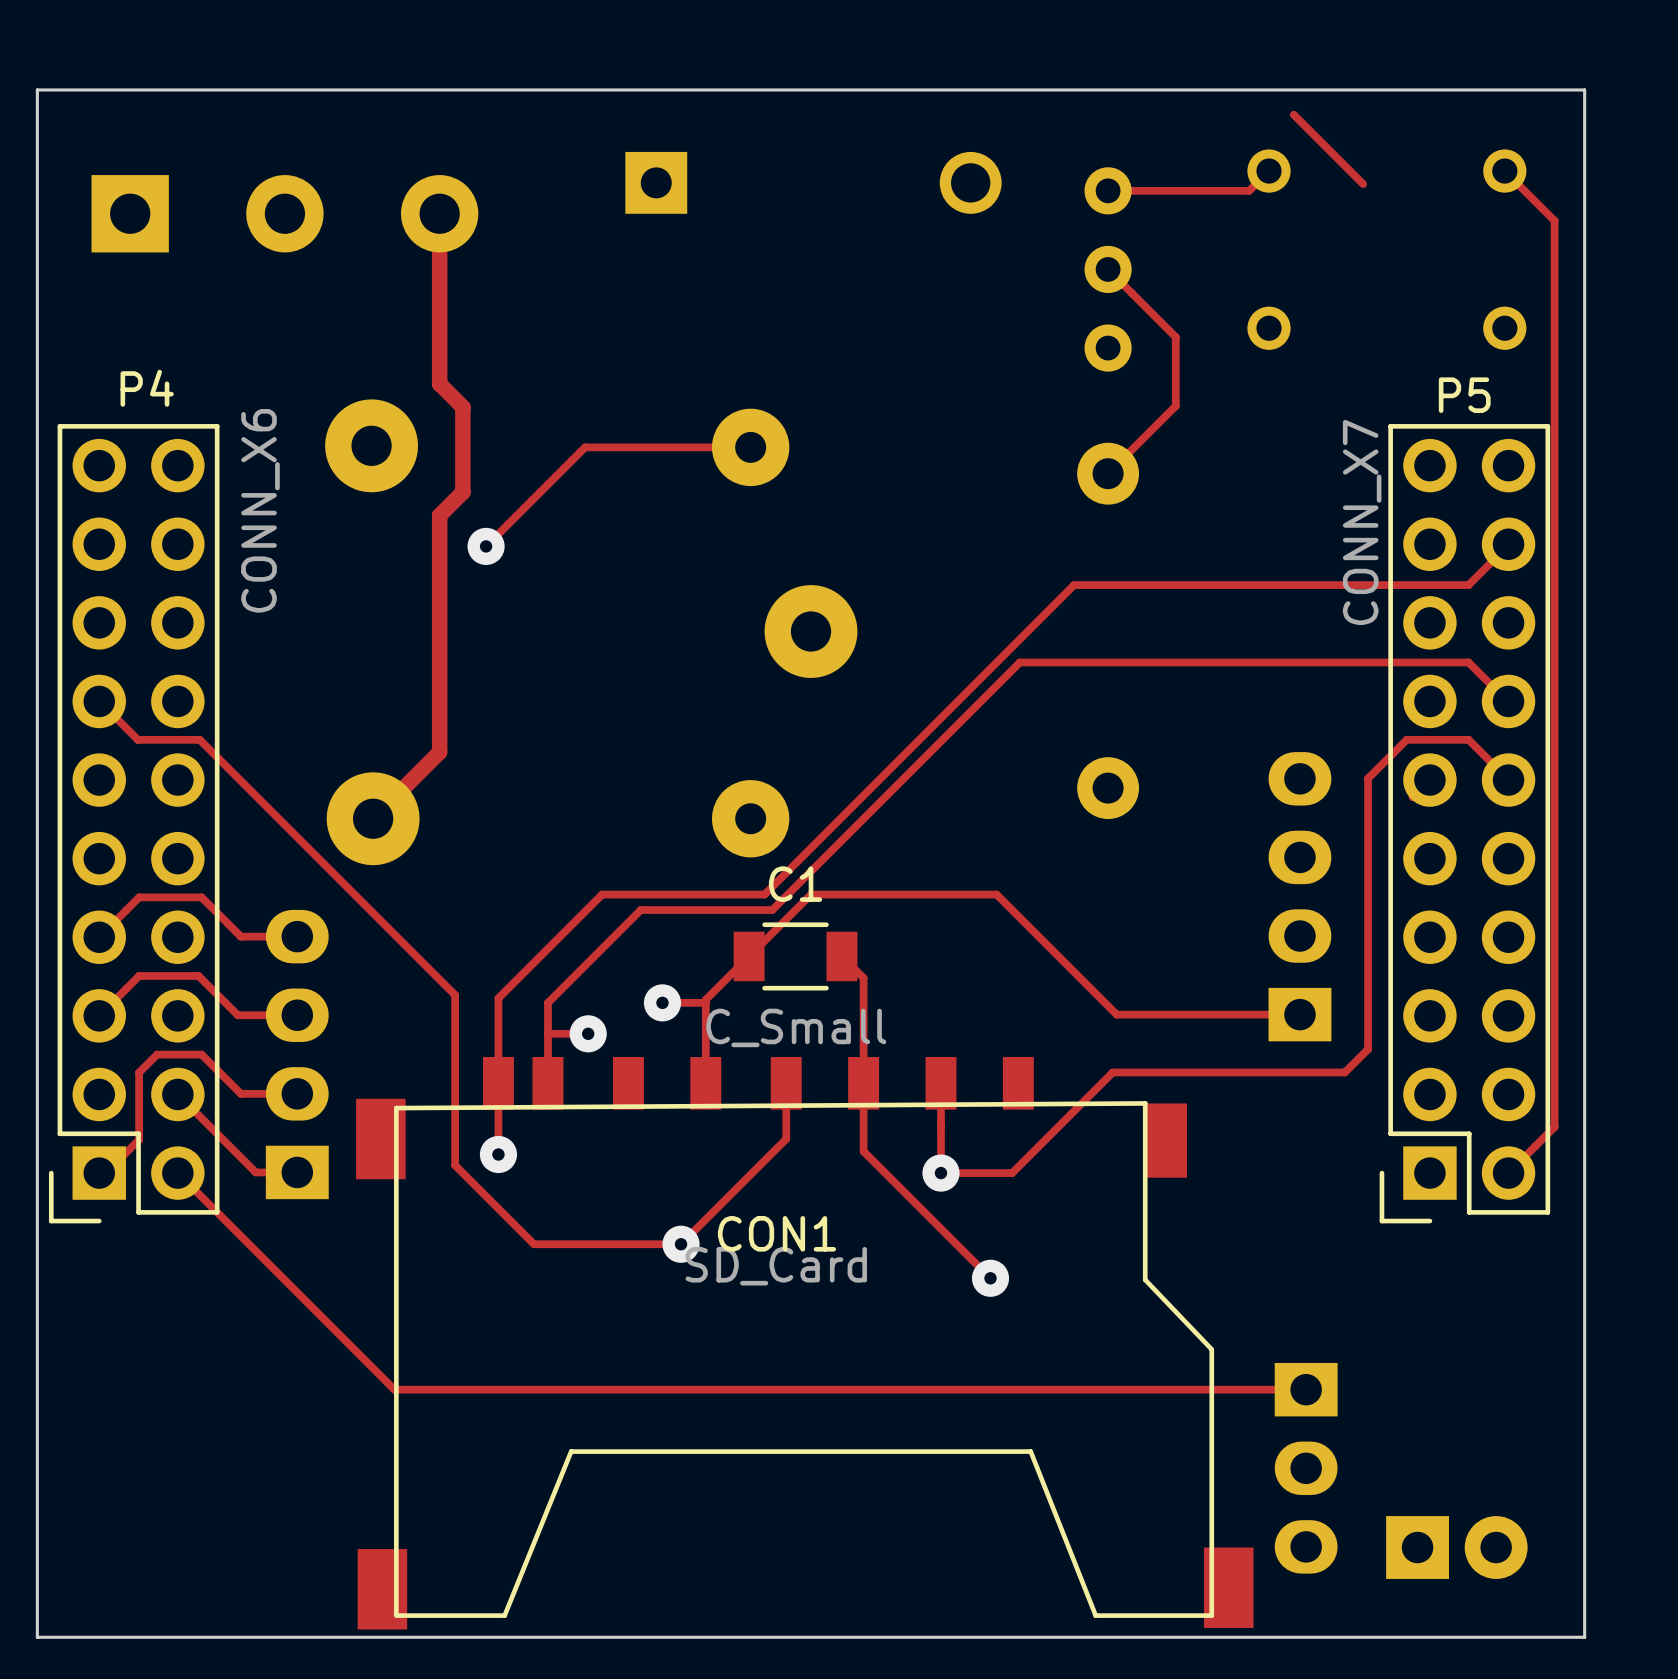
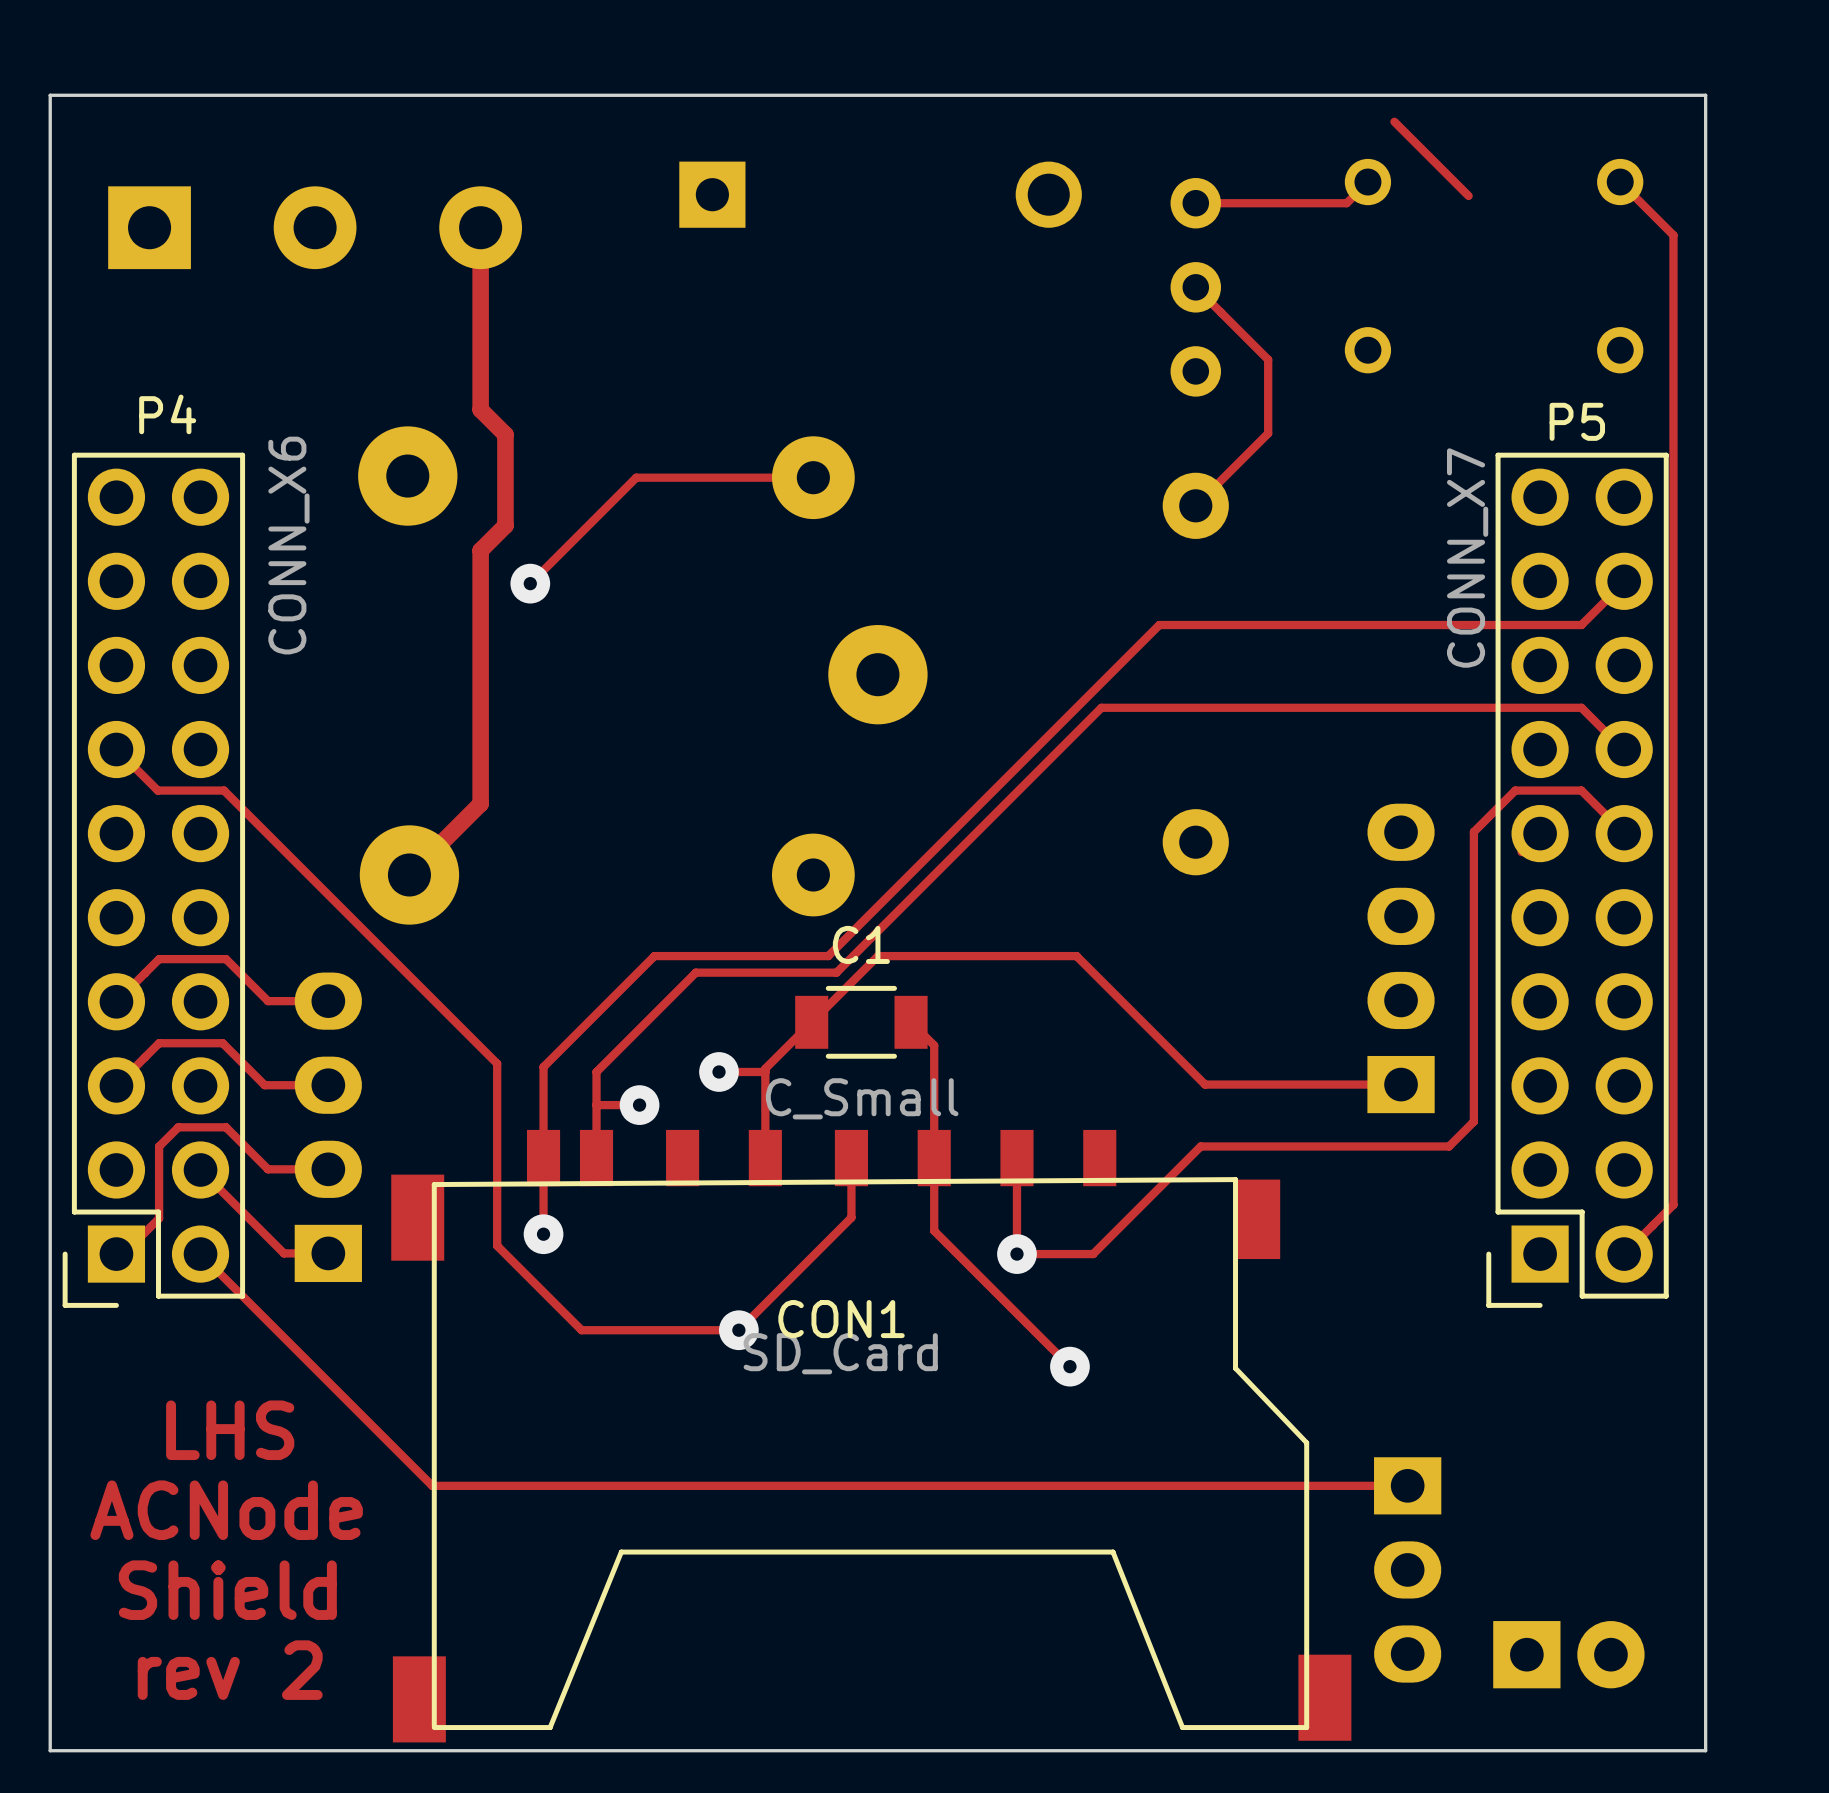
text: none -> LHS (230, 1430)
text: none -> ACNode (226, 1510)
text: none -> Shield (227, 1590)
text: none -> rev 2 (230, 1670)

